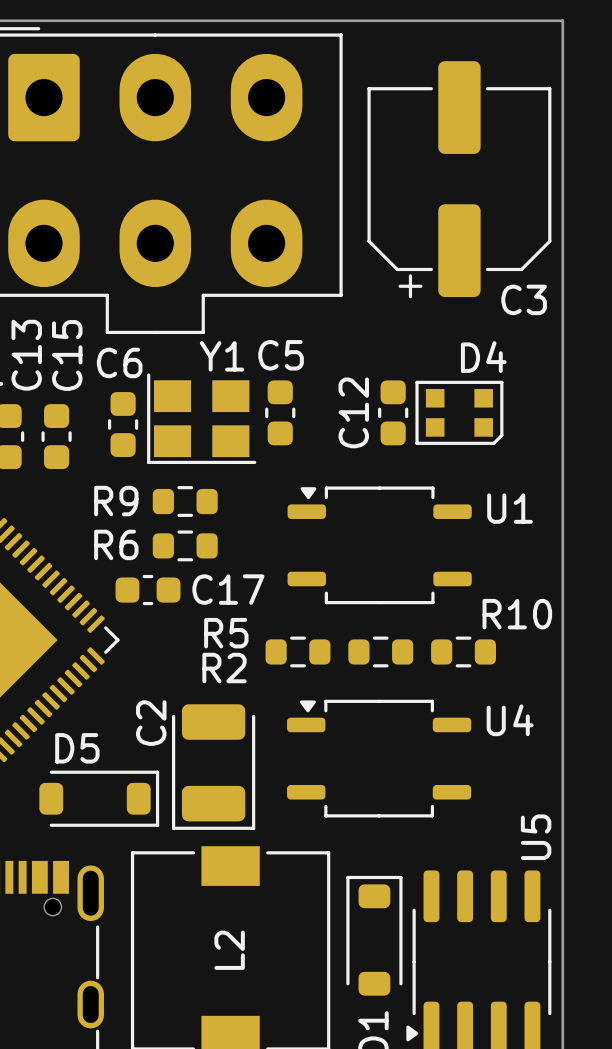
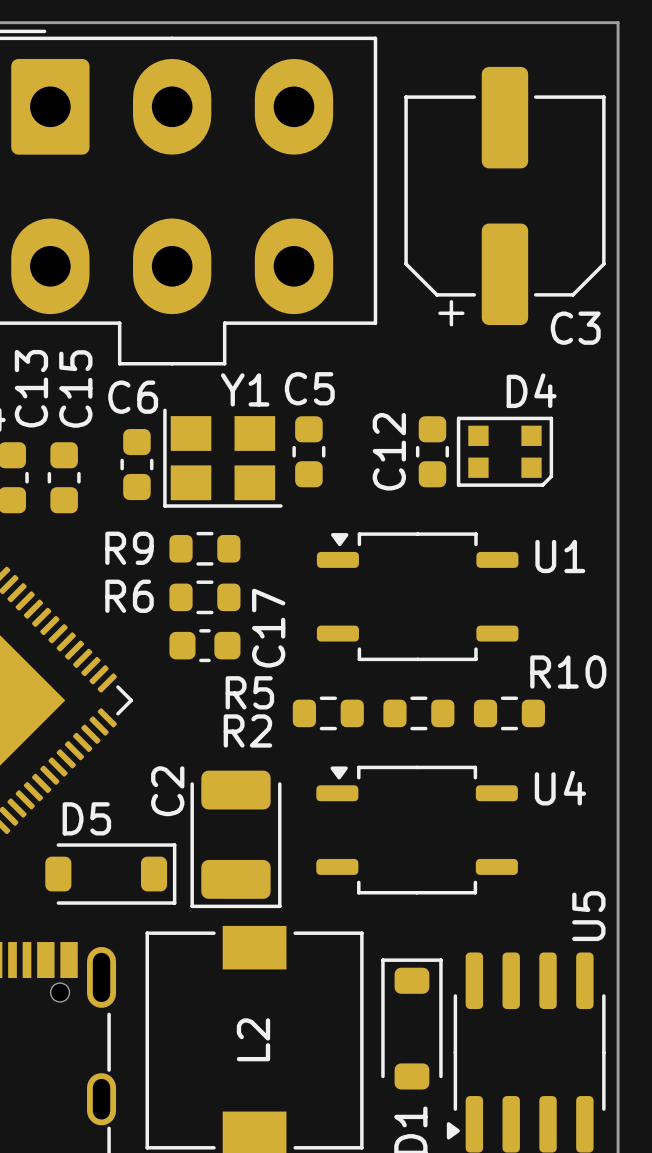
C17 name rotation: 0° (228, 589) -> 90° counterclockwise (268, 628)
C17 position: (148, 590) -> (204, 645)

